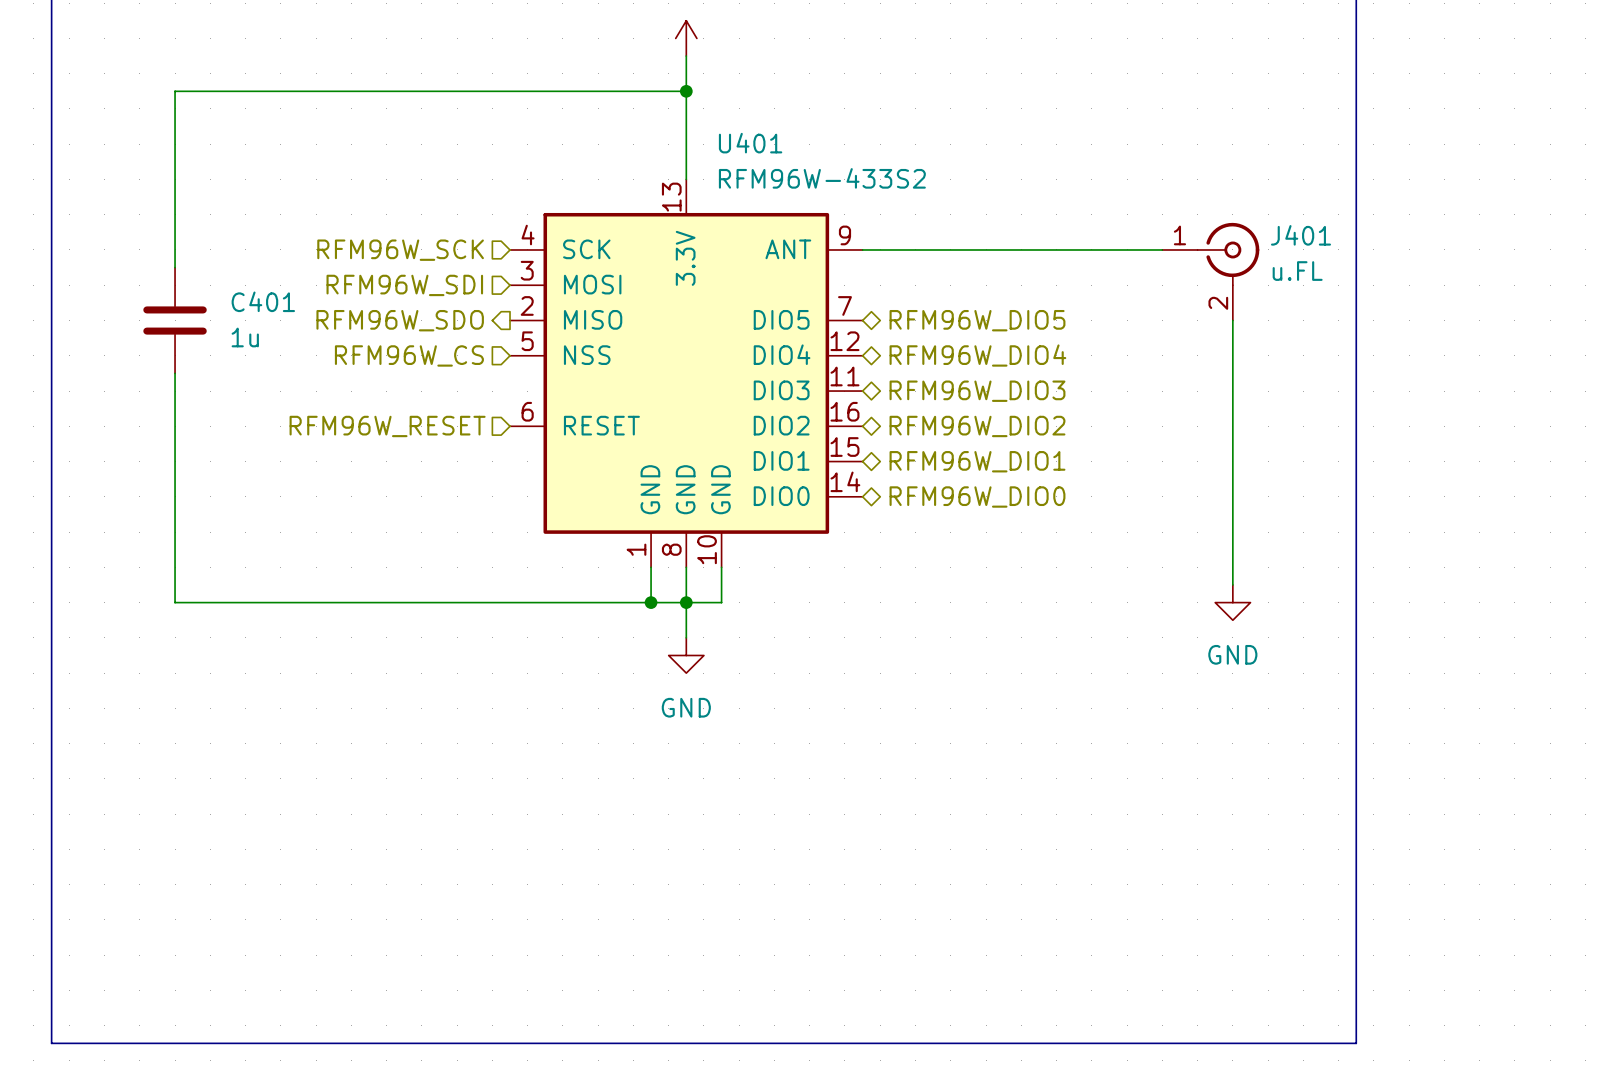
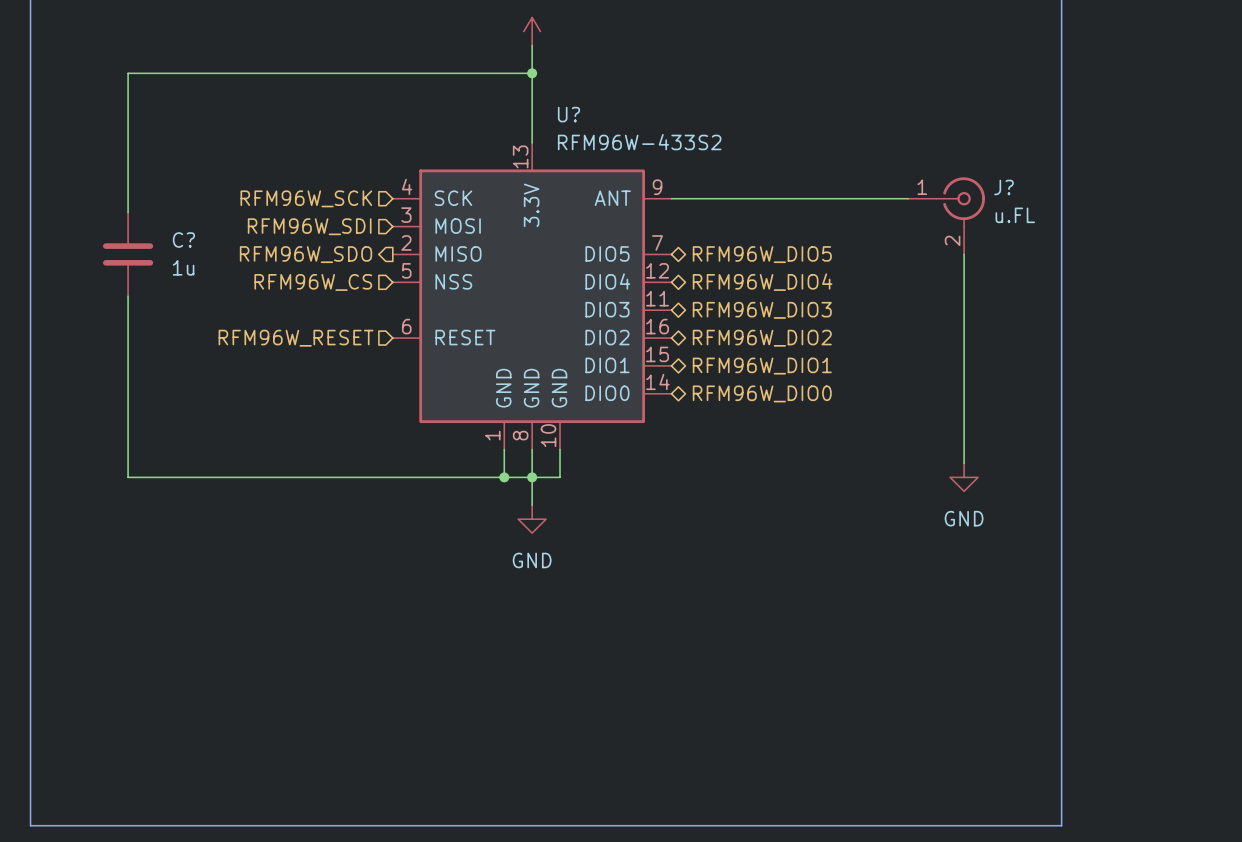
U401 name: U401 (750, 143) -> U? (569, 114)
J401 name: J401 (1300, 235) -> J? (1003, 187)
C401 name: C401 (263, 301) -> C? (183, 240)

